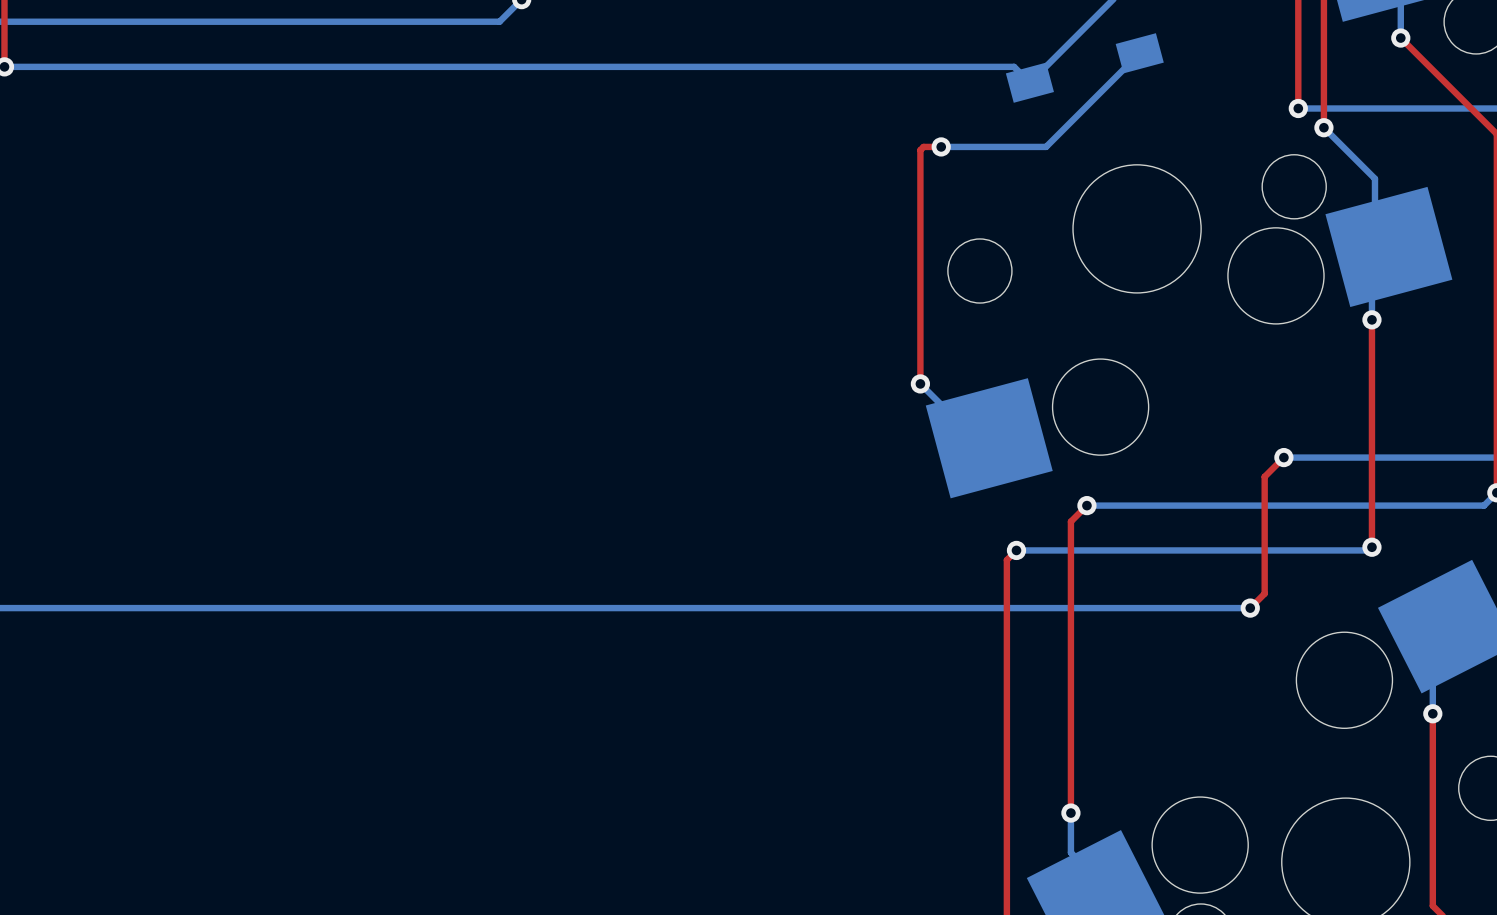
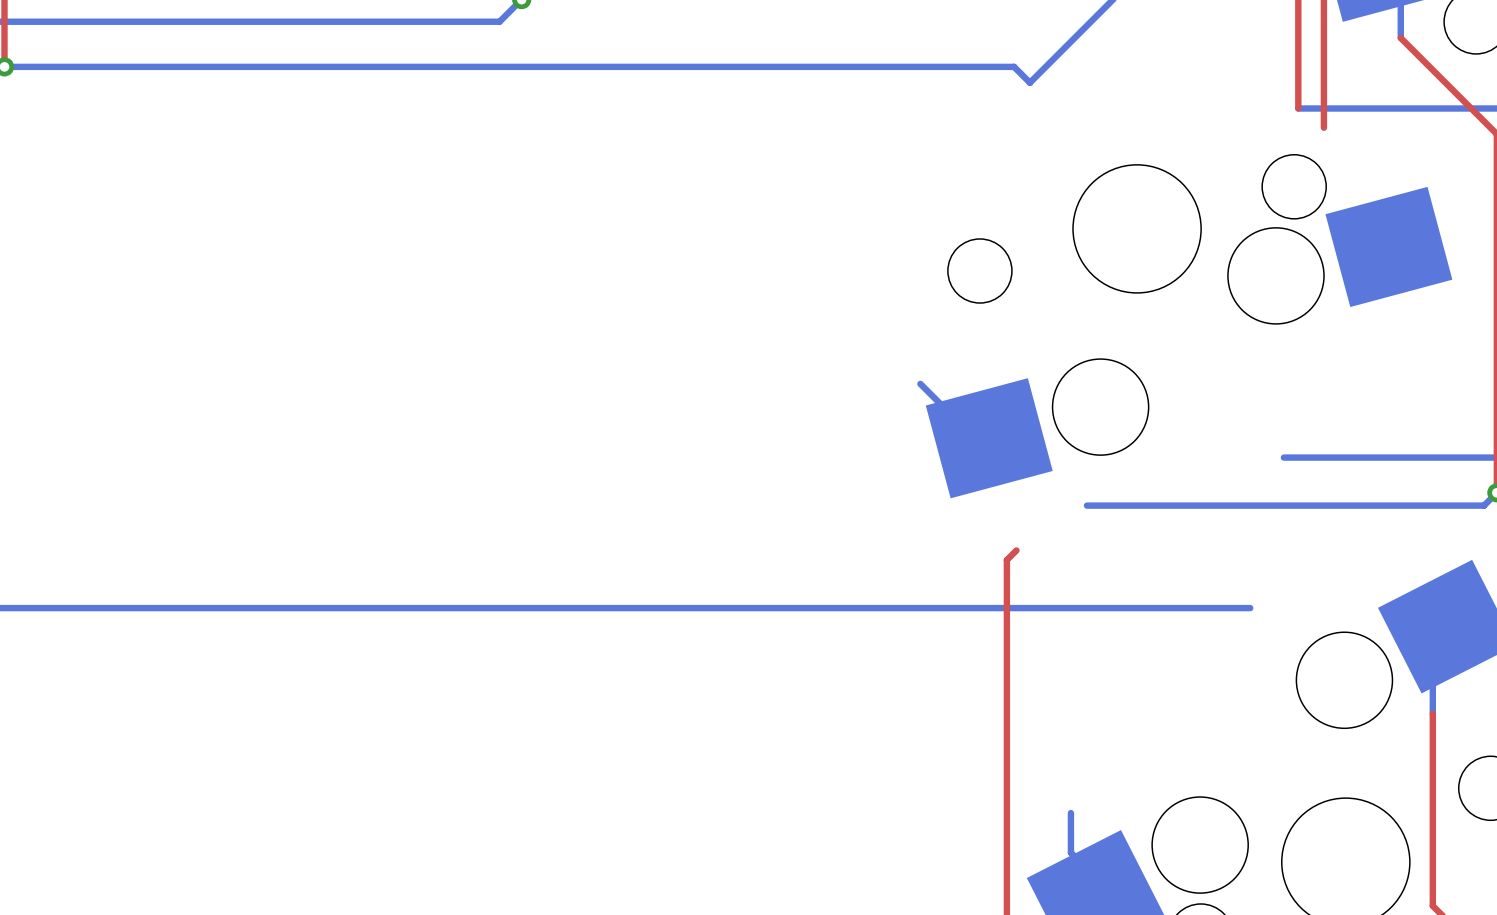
via: (1400, 38) -> none
bottom track: (1139, 53) (1046, 146) (941, 146) -> none
part: (1084, 68) -> none
via: (1298, 108) -> none
bottom track: (1323, 127) (1374, 178) (1374, 250) (1371, 253) (1371, 319) -> none
via: (1323, 127) -> none
top track: (941, 146) (923, 146) (920, 150) (920, 383) -> none
via: (941, 146) -> none
top track: (1371, 319) (1371, 547) -> none
via: (1371, 319) -> none
via: (920, 383) -> none
top track: (1283, 457) (1264, 476) (1264, 593) (1250, 608) -> none
via: (1283, 457) -> none
top track: (1086, 505) (1070, 521) (1070, 813) -> none
via: (1086, 505) -> none
bottom track: (1371, 547) (1368, 550) (1016, 550) -> none
via: (1371, 547) -> none
via: (1016, 550) -> none
via: (1250, 608) -> none
via: (1432, 713) -> none
via: (1070, 813) -> none

